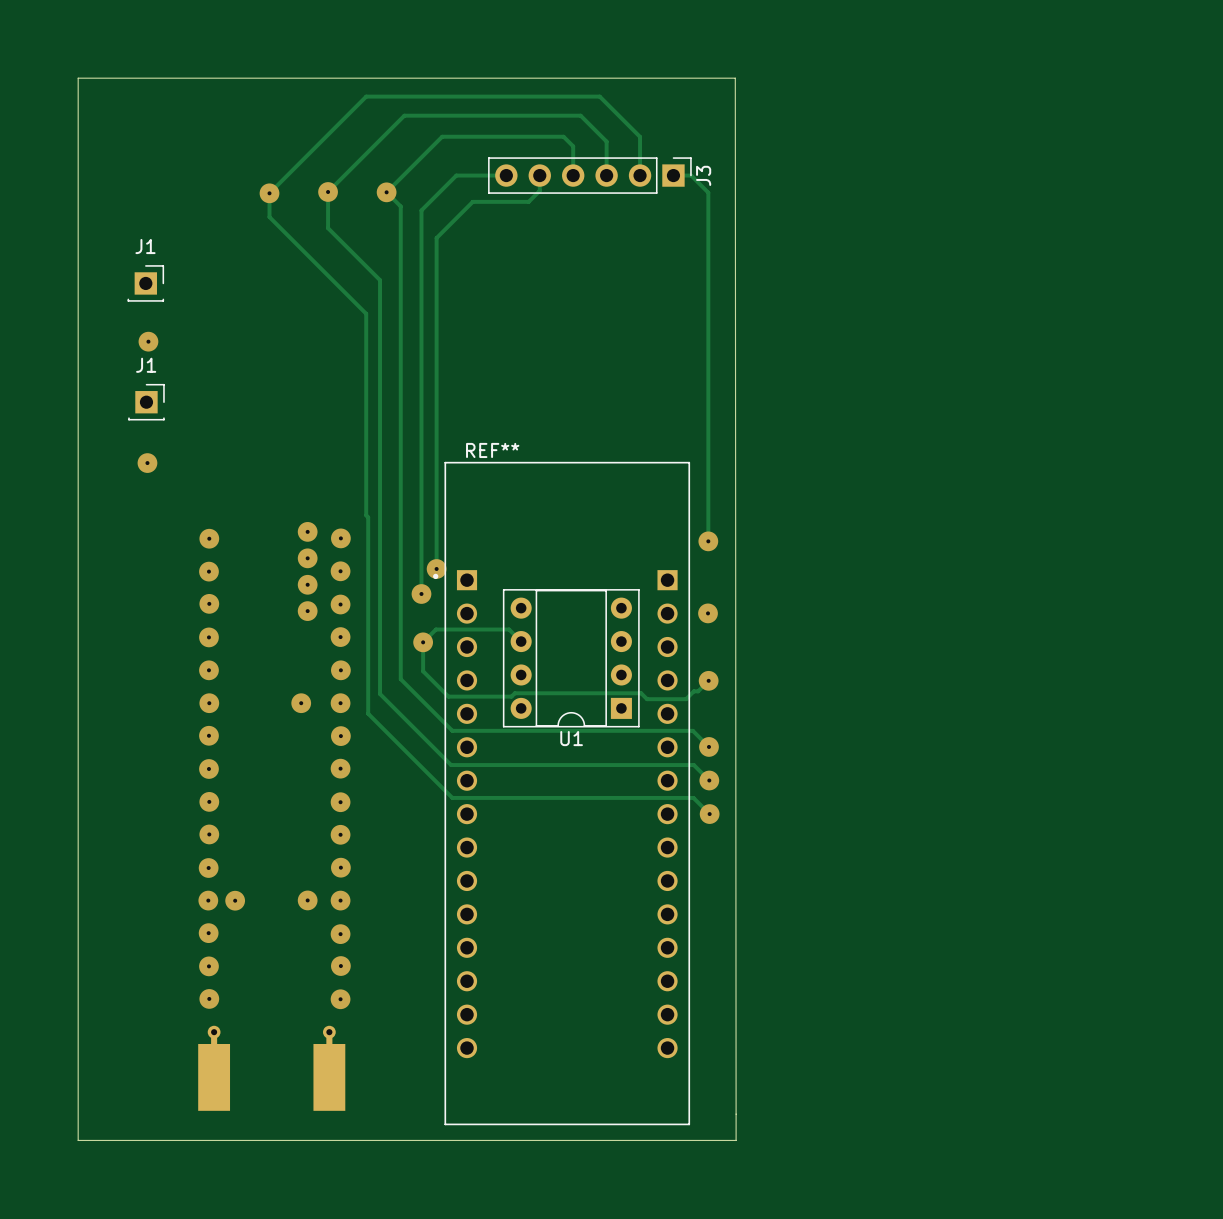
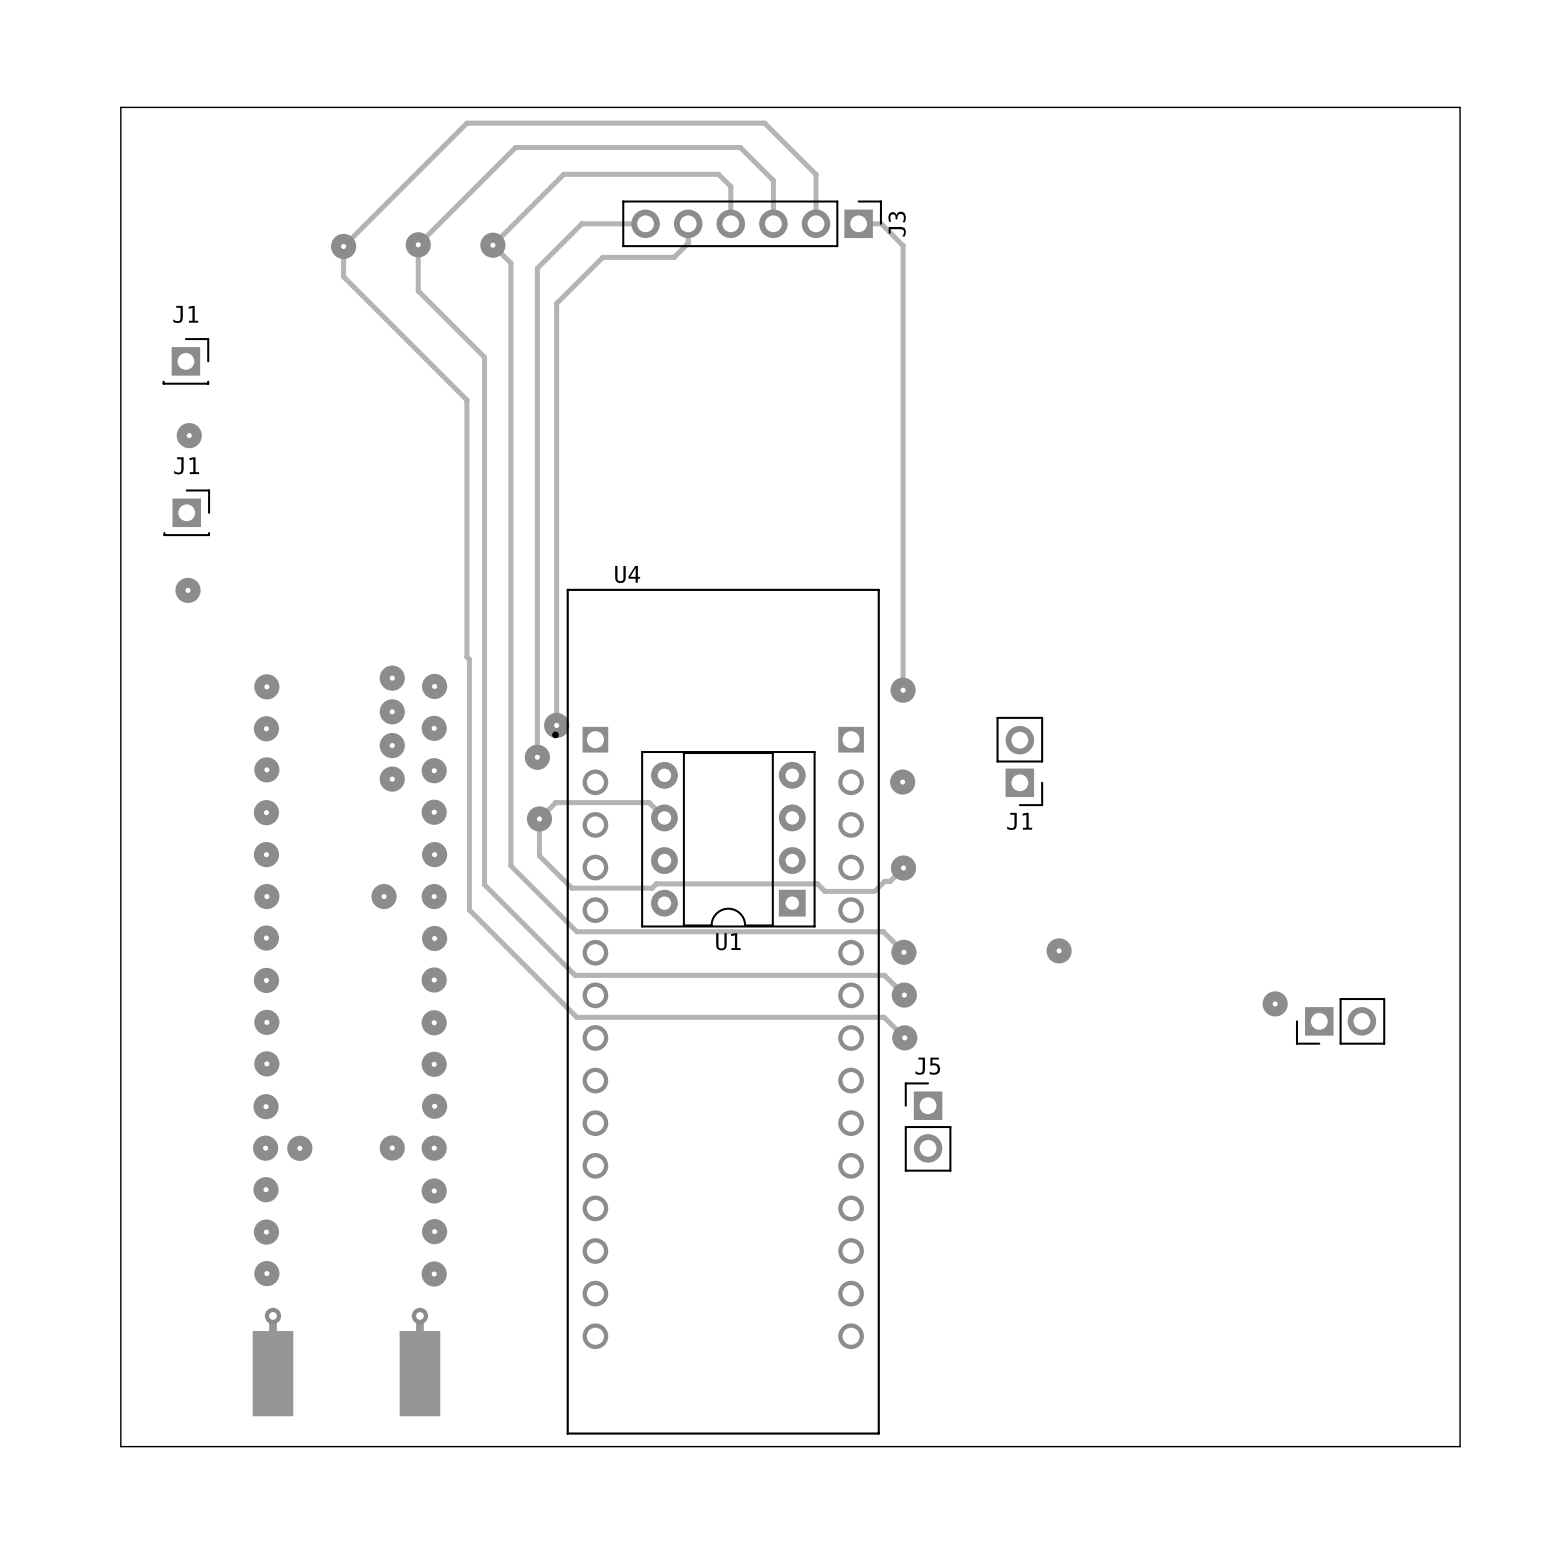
board edge: (78, 78) (735, 78) (736, 1140) (78, 1140) (78, 78) -> (120, 107) (120, 1446) (1460, 1446) (1460, 107) (120, 107)
REF** name: REF** (492, 450) -> U4 (627, 574)
J1: none -> (1019, 761)
via: none -> (1059, 950)
via: none -> (1275, 1003)
part: none -> (1340, 1021)
J5: none -> (928, 1127)

